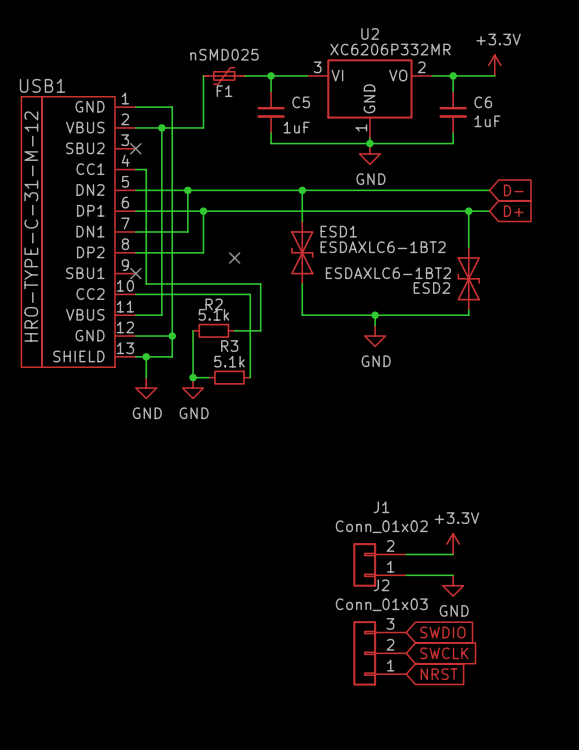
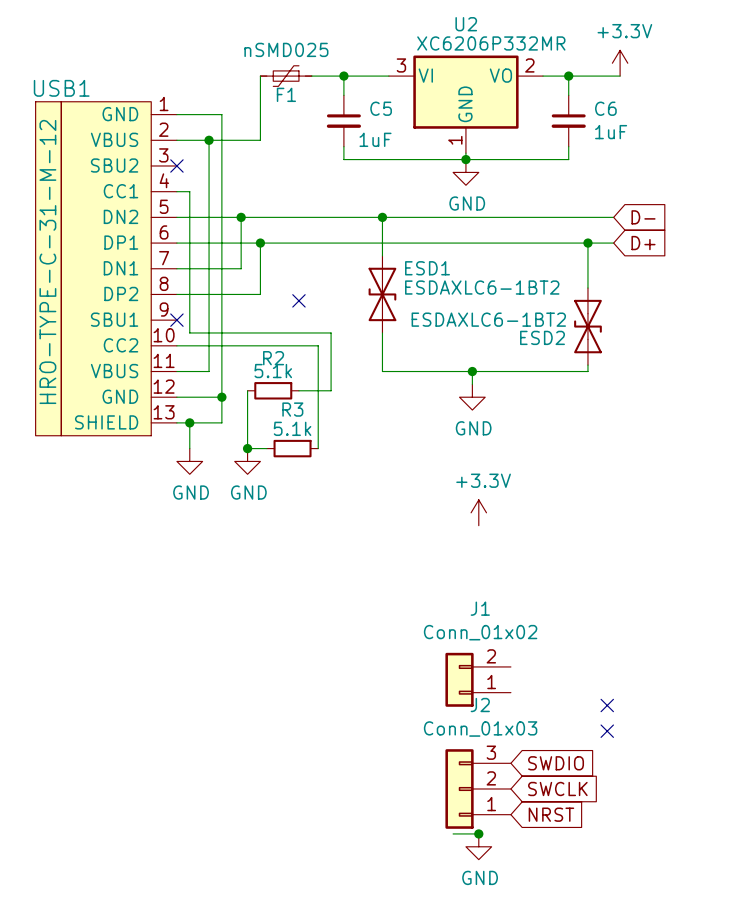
power symbol position: +3.3V (453, 544) -> +3.3V (478, 512)
wire: (406, 554) (453, 554) -> none
wire: (406, 575) (453, 575) -> none
power symbol position: GND (453, 585) -> GND (478, 846)
no-connect mark: none -> (607, 705)
no-connect mark: none -> (607, 731)
wire: none -> (453, 833) (478, 833)
junction: none -> (478, 833)

